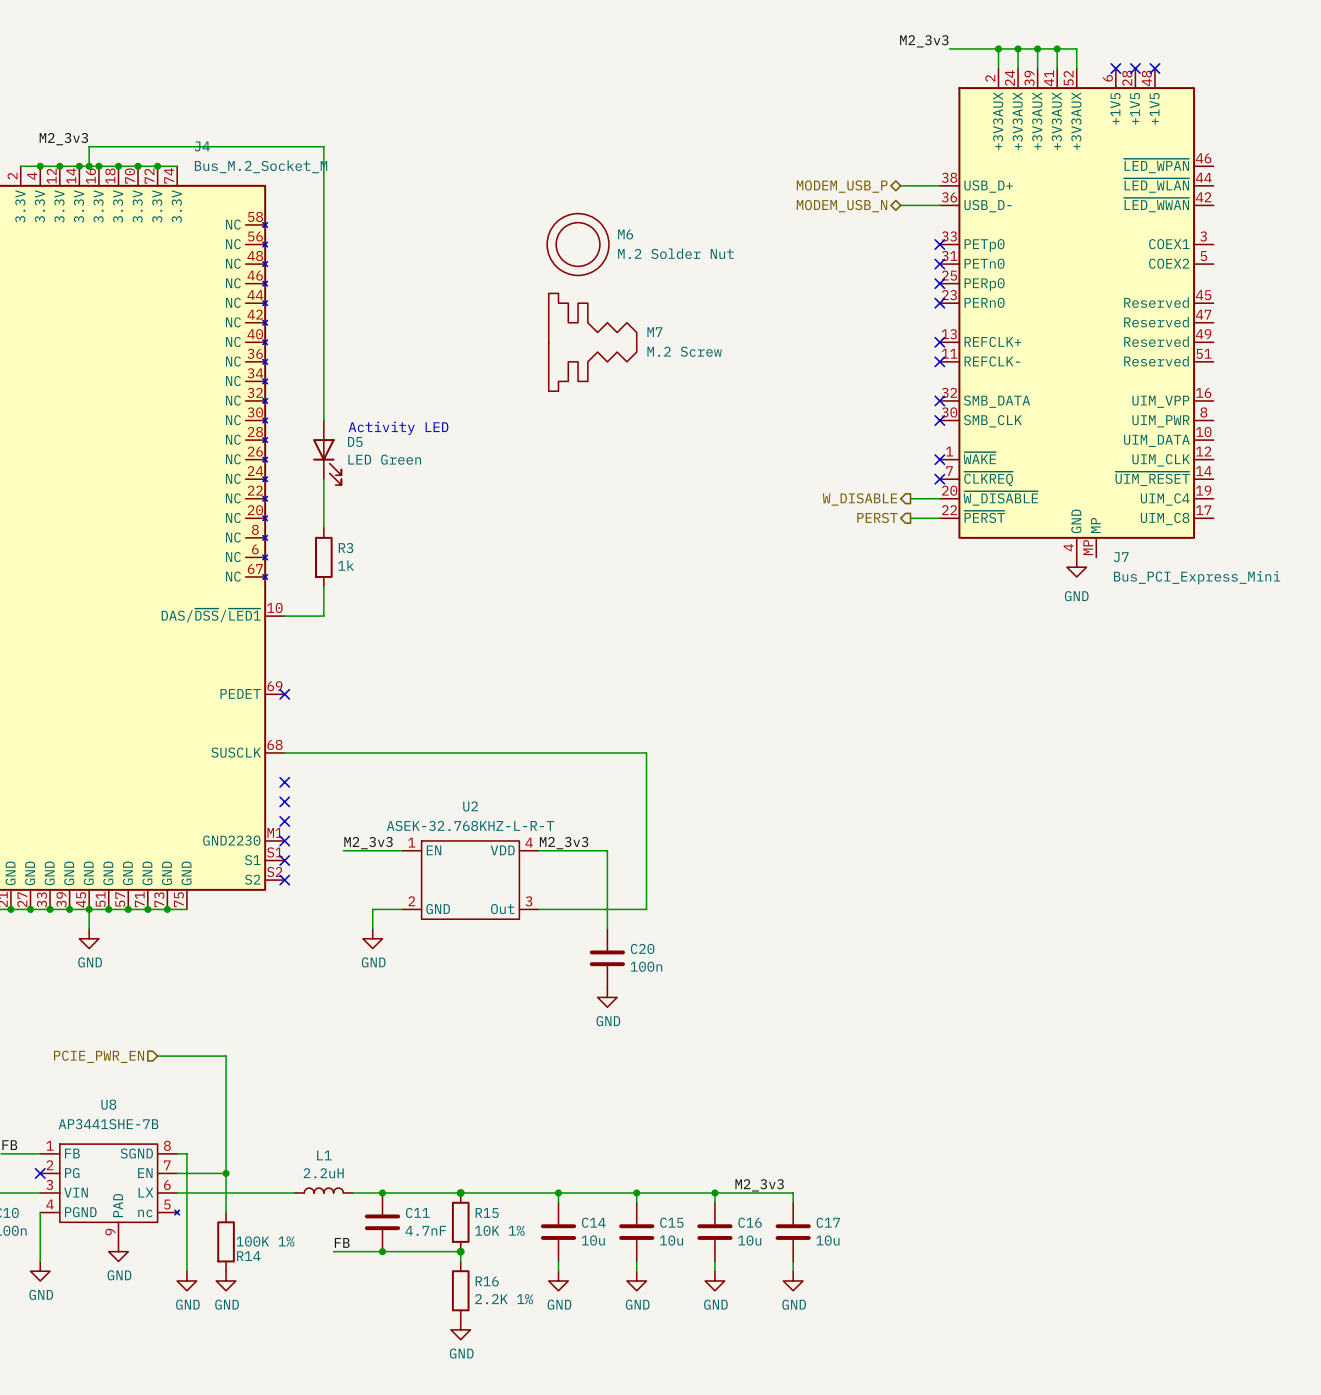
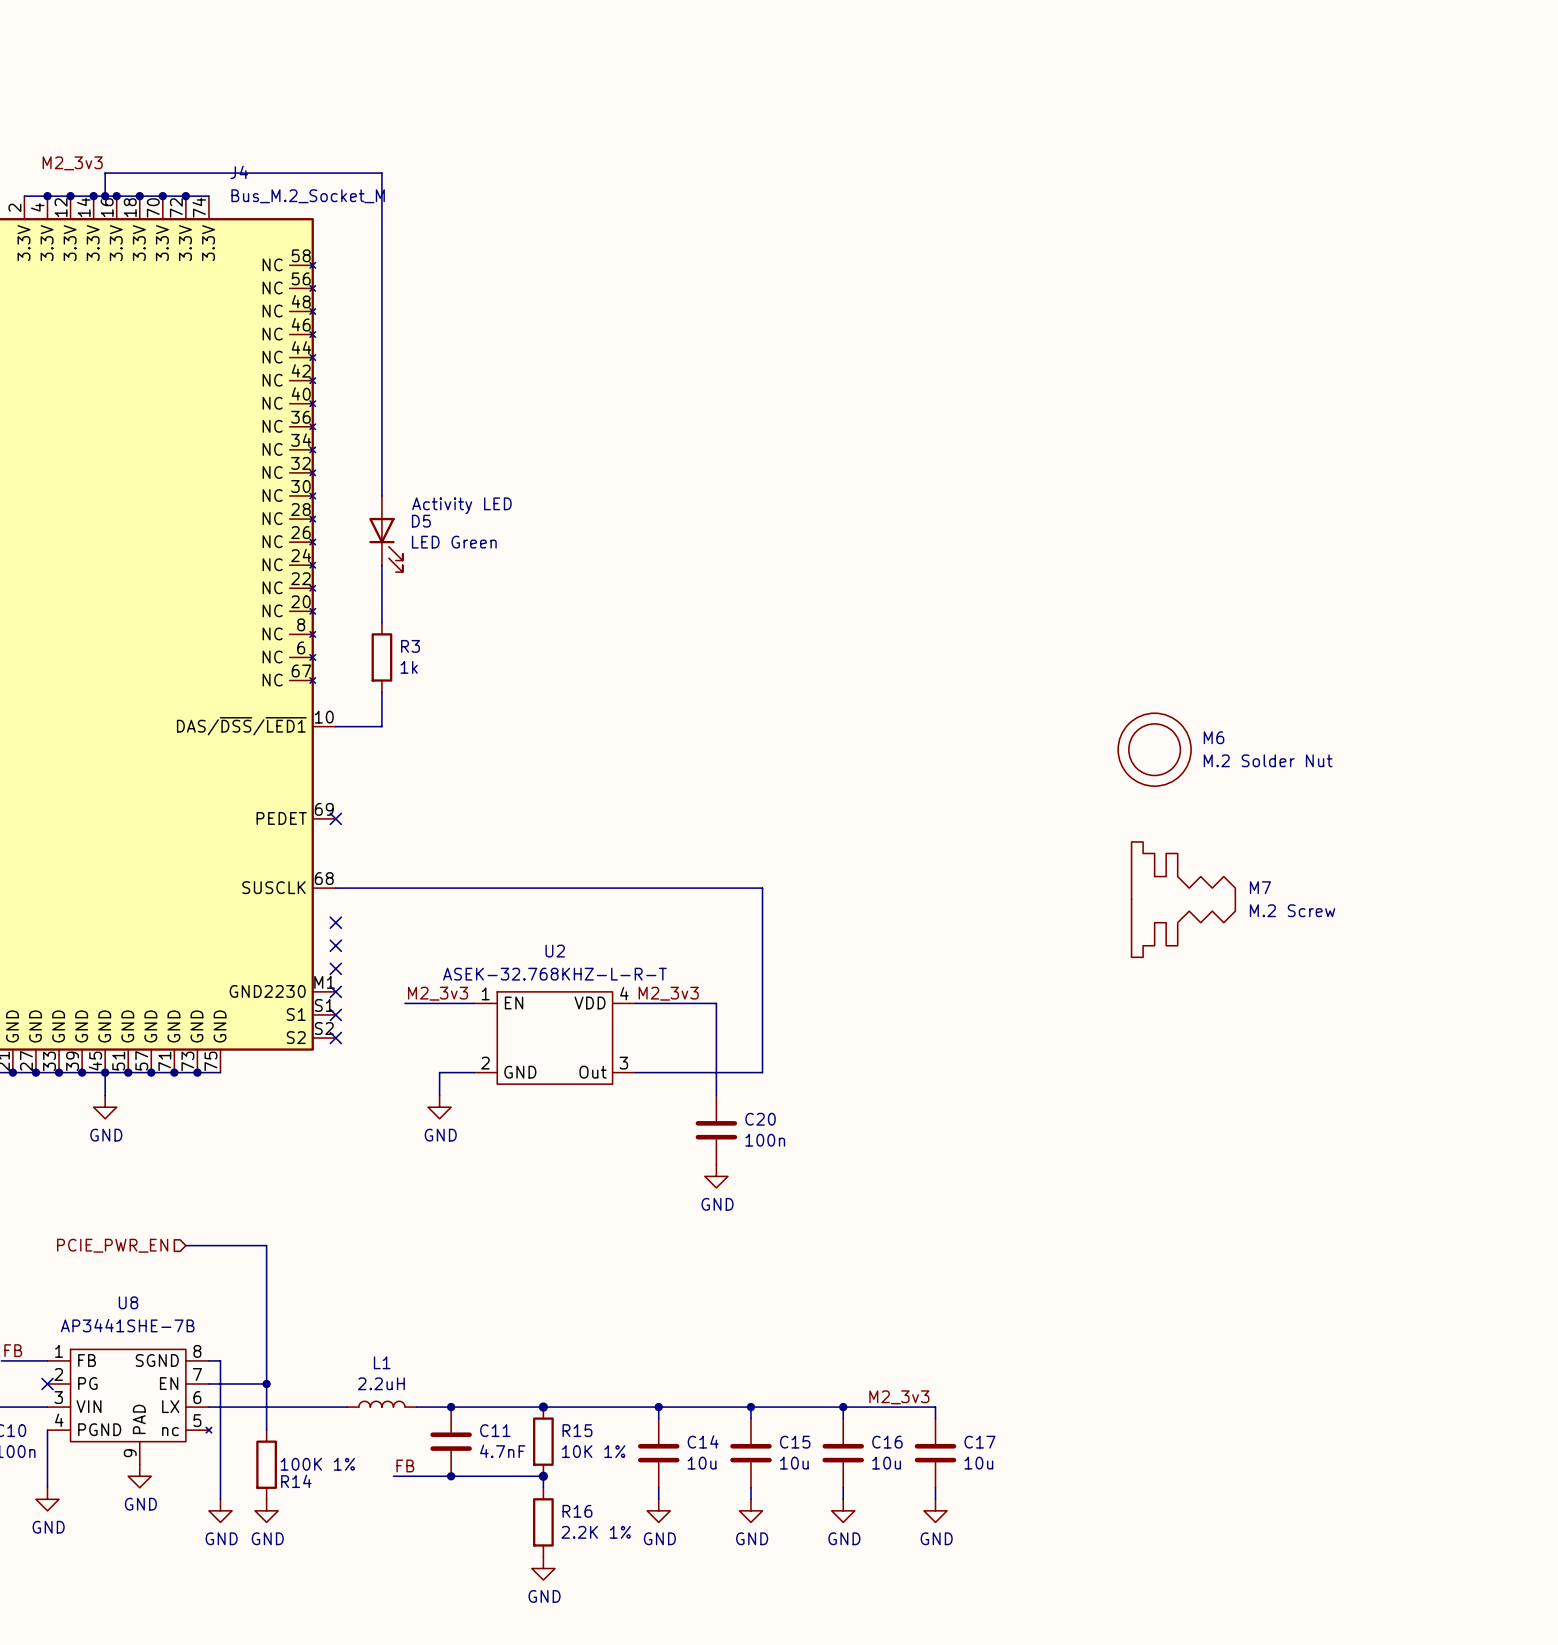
label: M2_3v3 (924, 41) -> none
wire: (949, 48) (1076, 48) (1076, 68) -> none
wire: (998, 48) (998, 68) -> none
junction: (998, 48) -> none
wire: (1018, 48) (1018, 68) -> none
junction: (1018, 48) -> none
wire: (1037, 48) (1037, 68) -> none
junction: (1037, 48) -> none
wire: (1057, 48) (1057, 68) -> none
junction: (1057, 48) -> none
no-connect mark: (1115, 68) -> none
no-connect mark: (1135, 68) -> none
no-connect mark: (1154, 68) -> none
wire: (900, 185) (939, 185) -> none
hierarchical label: MODEM_USB_P (842, 186) -> none
wire: (900, 205) (939, 205) -> none
hierarchical label: MODEM_USB_N (841, 206) -> none
M6 position: (578, 244) -> (1154, 749)
no-connect mark: (939, 244) -> none
no-connect mark: (939, 264) -> none
no-connect mark: (939, 283) -> none
no-connect mark: (939, 303) -> none
J7: Bus_PCI_Express_Mini (1076, 312) -> none
M7 position: (592, 342) -> (1183, 899)
no-connect mark: (939, 342) -> none
no-connect mark: (939, 361) -> none
no-connect mark: (939, 400) -> none
no-connect mark: (939, 420) -> none
no-connect mark: (939, 459) -> none
no-connect mark: (939, 479) -> none
wire: (910, 498) (939, 498) -> none
hierarchical label: W_DISABLE (859, 499) -> none
hierarchical label: PERST (877, 517) -> none
wire: (910, 518) (939, 518) -> none
power symbol: GND (1076, 567) -> none

